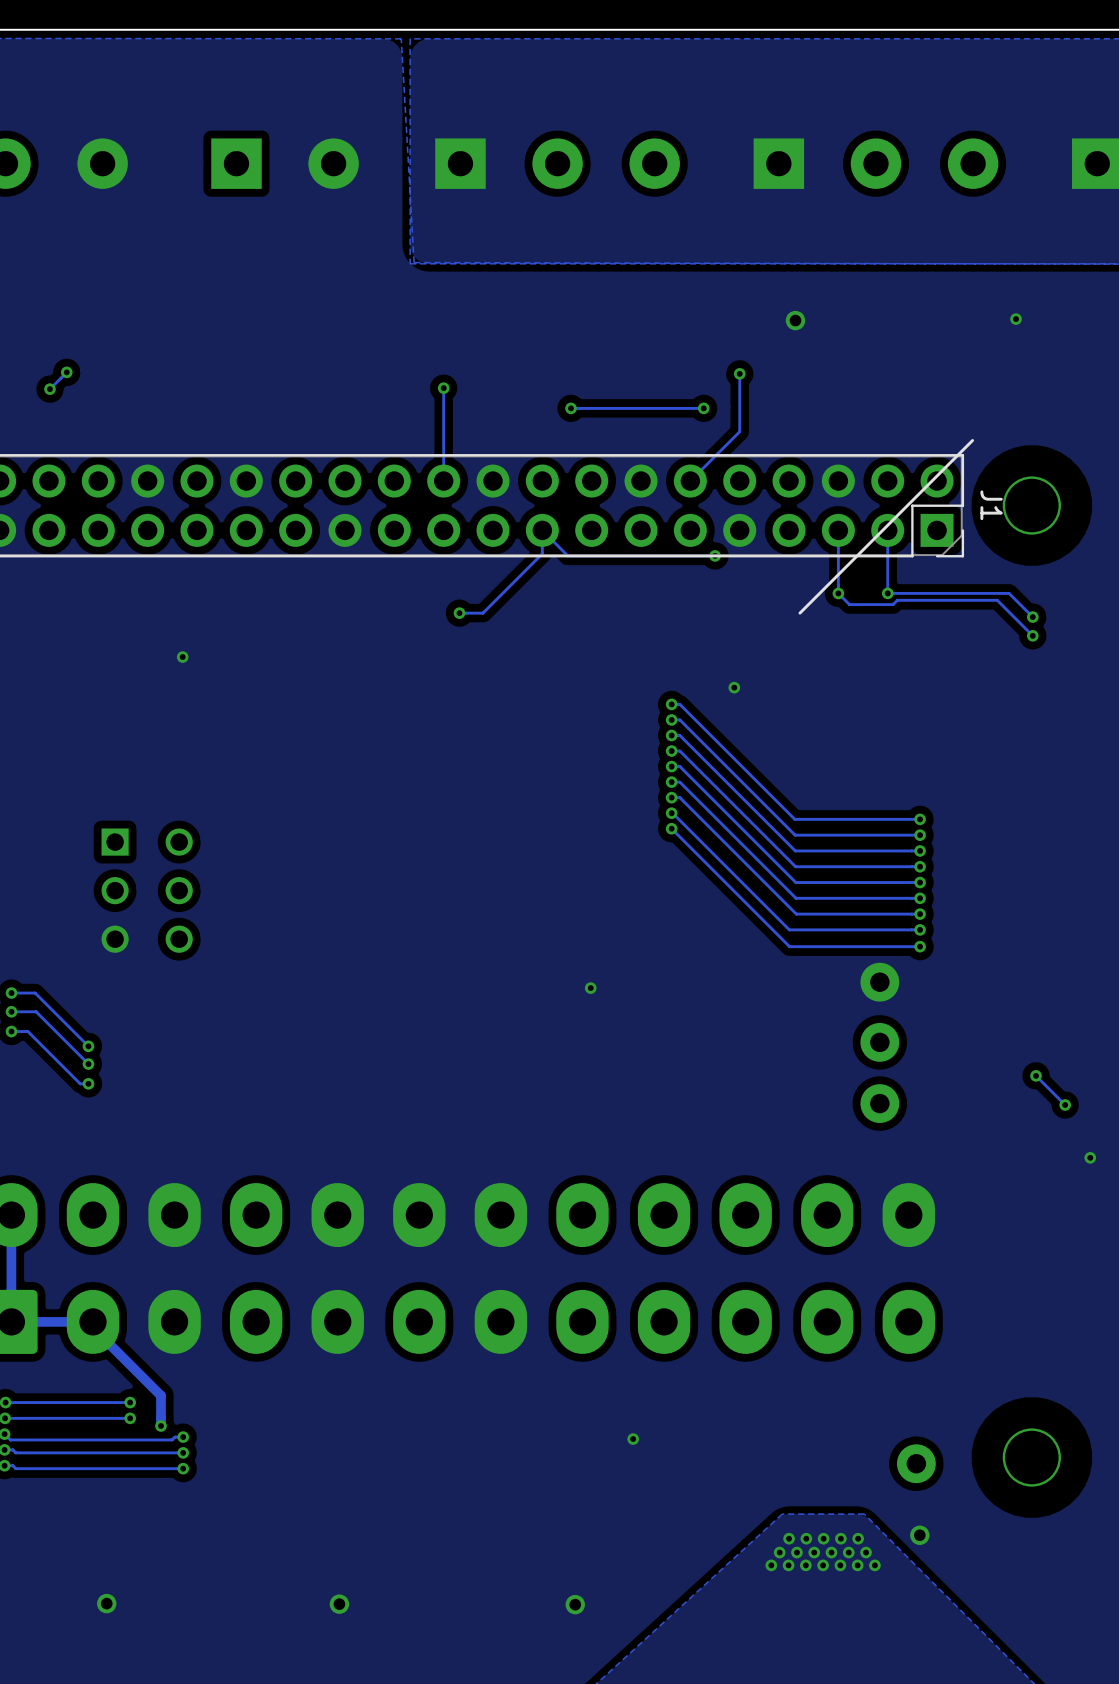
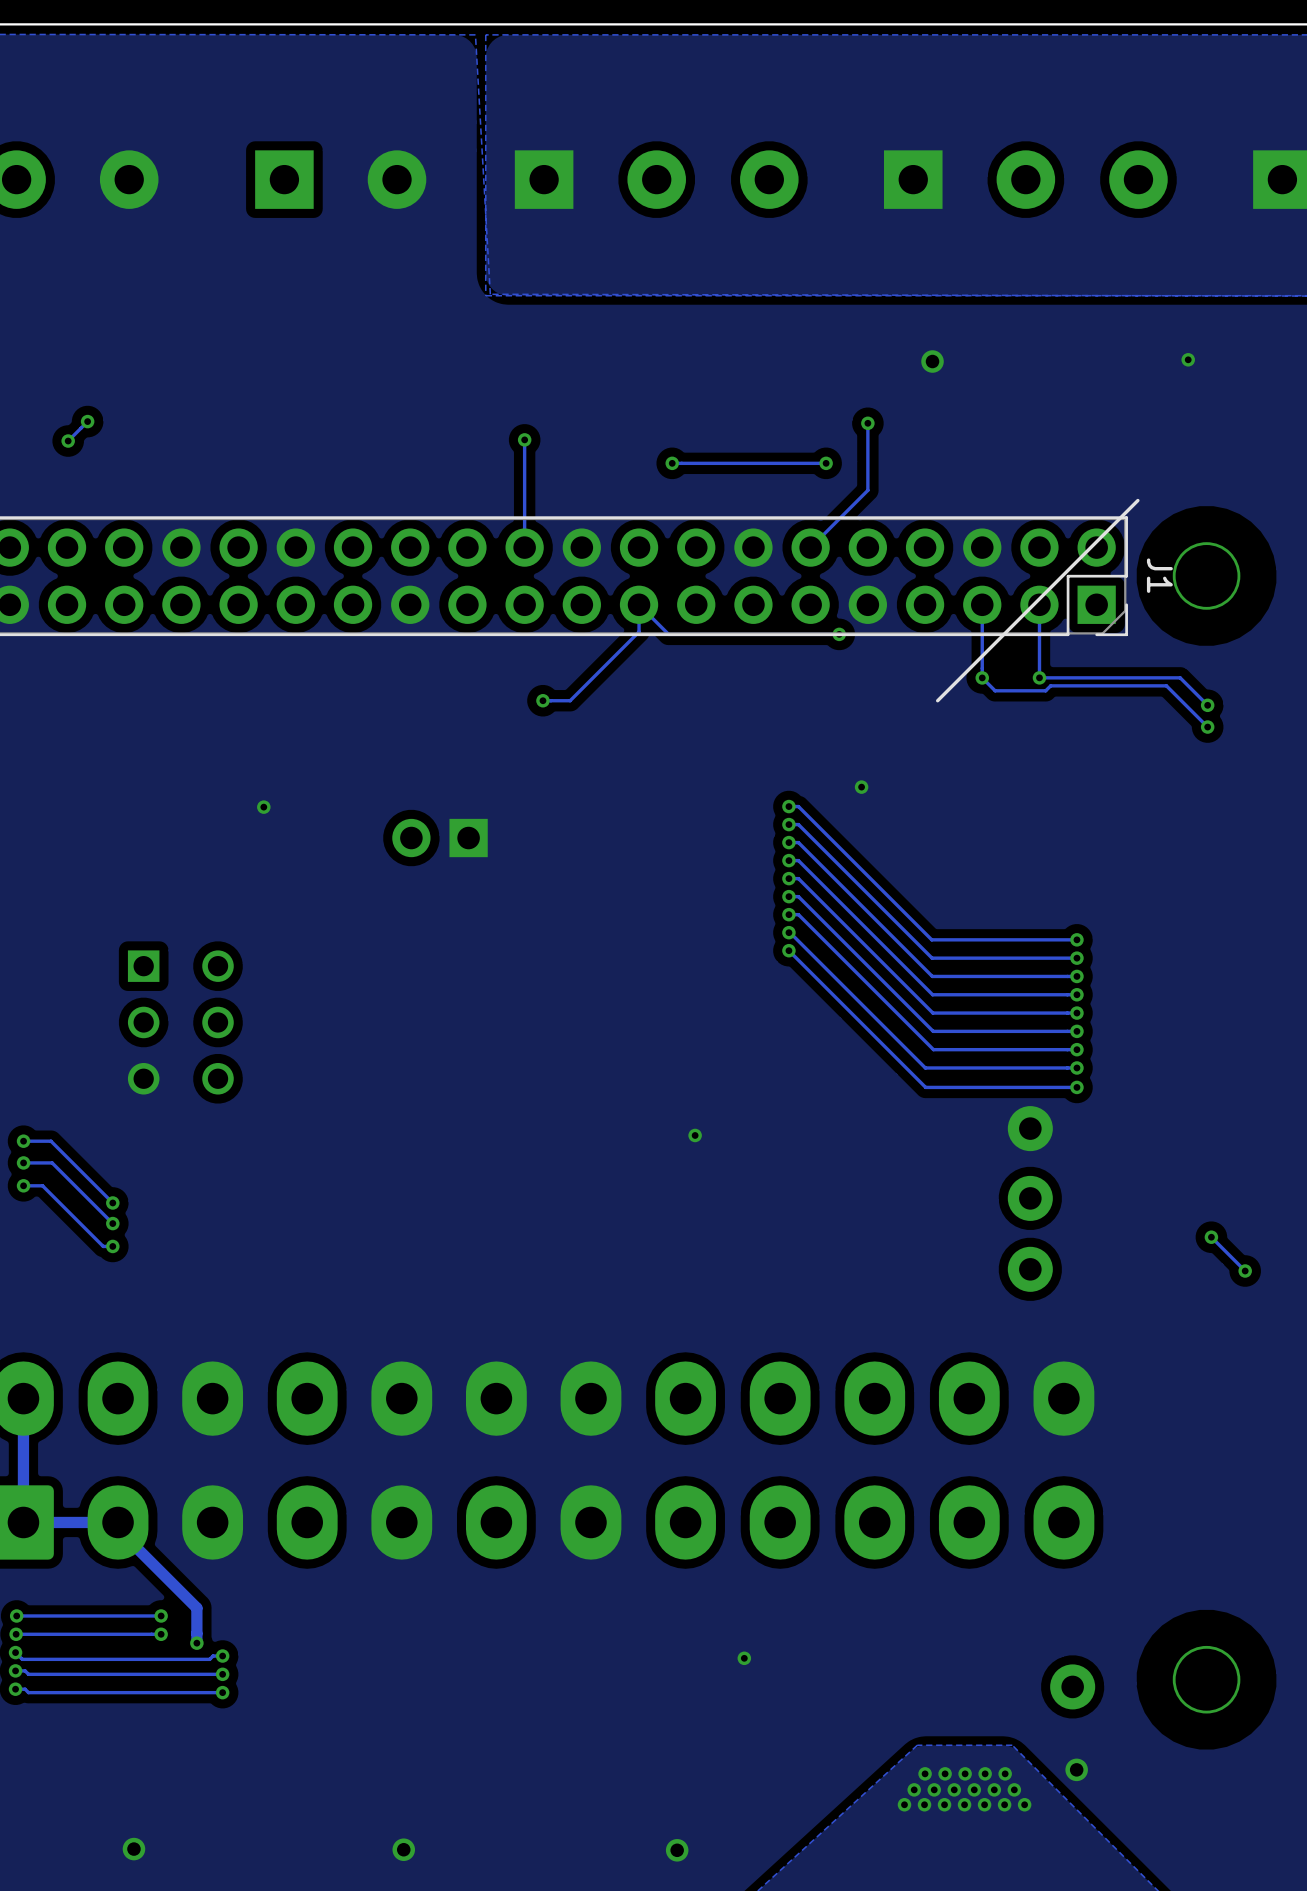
via position: (182, 657) -> (263, 807)
part: none -> (440, 838)
via: (1090, 1157) -> none

